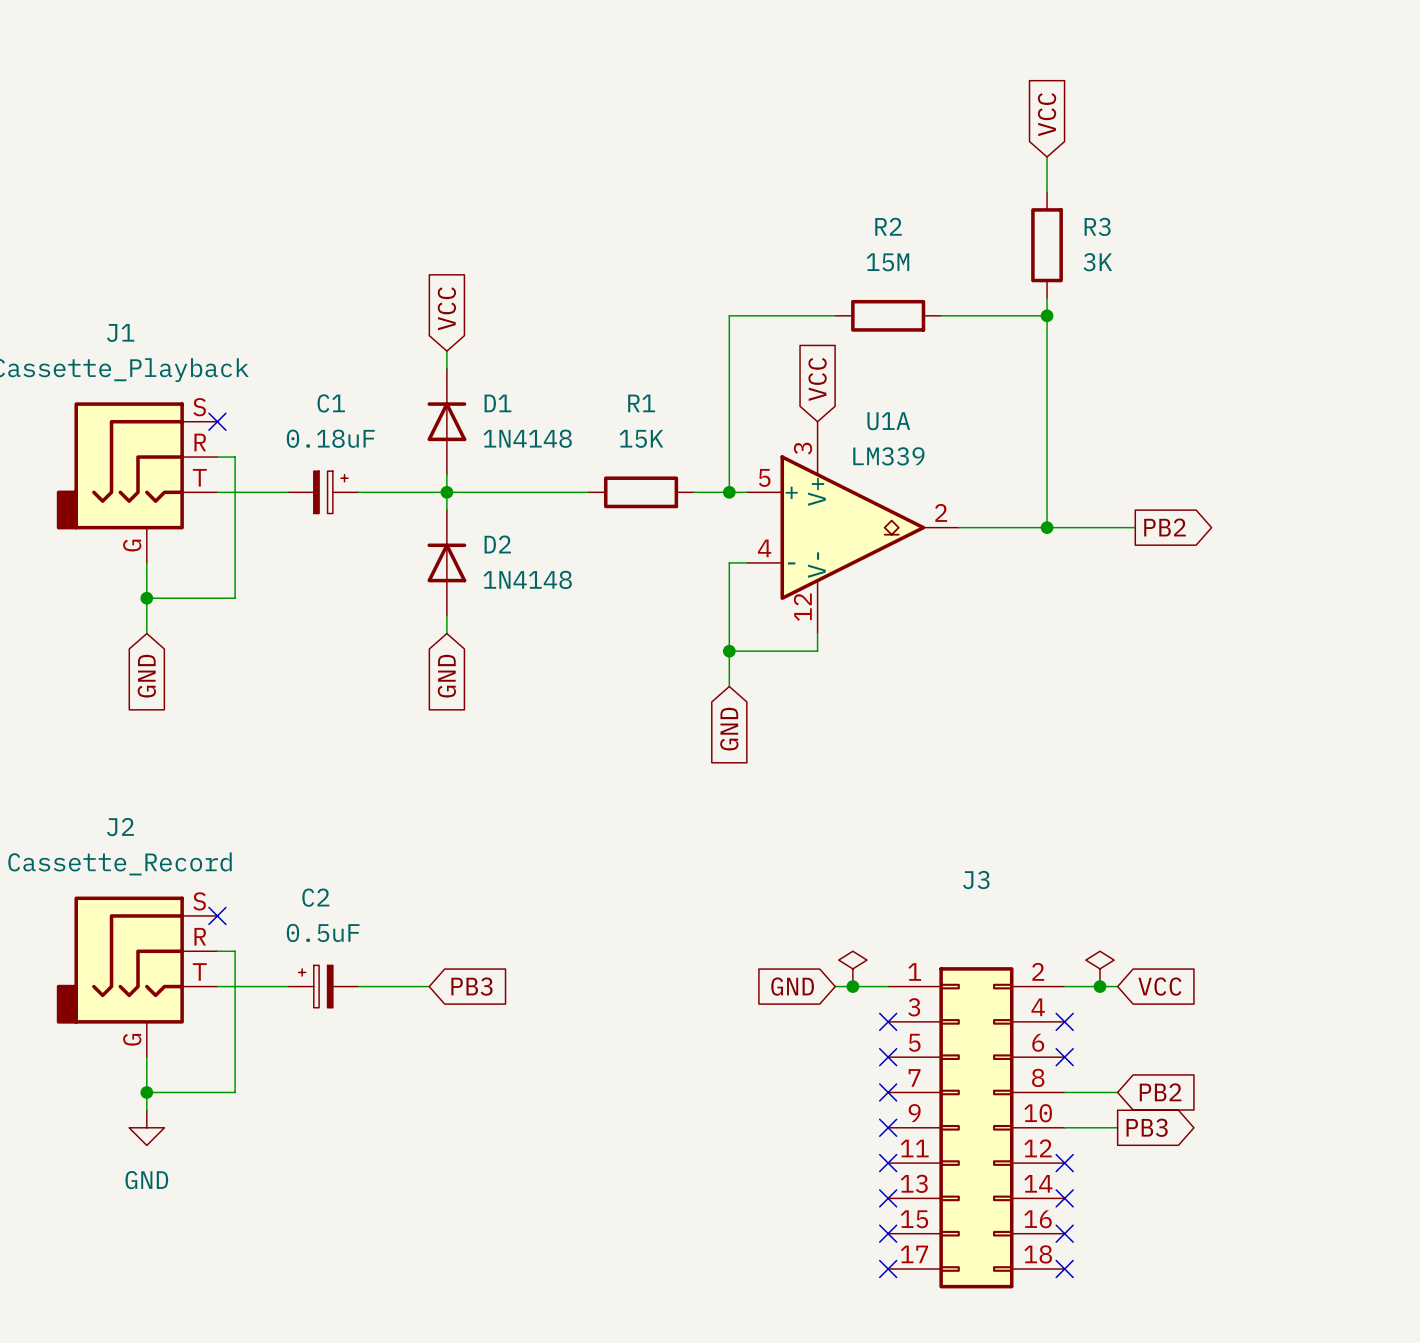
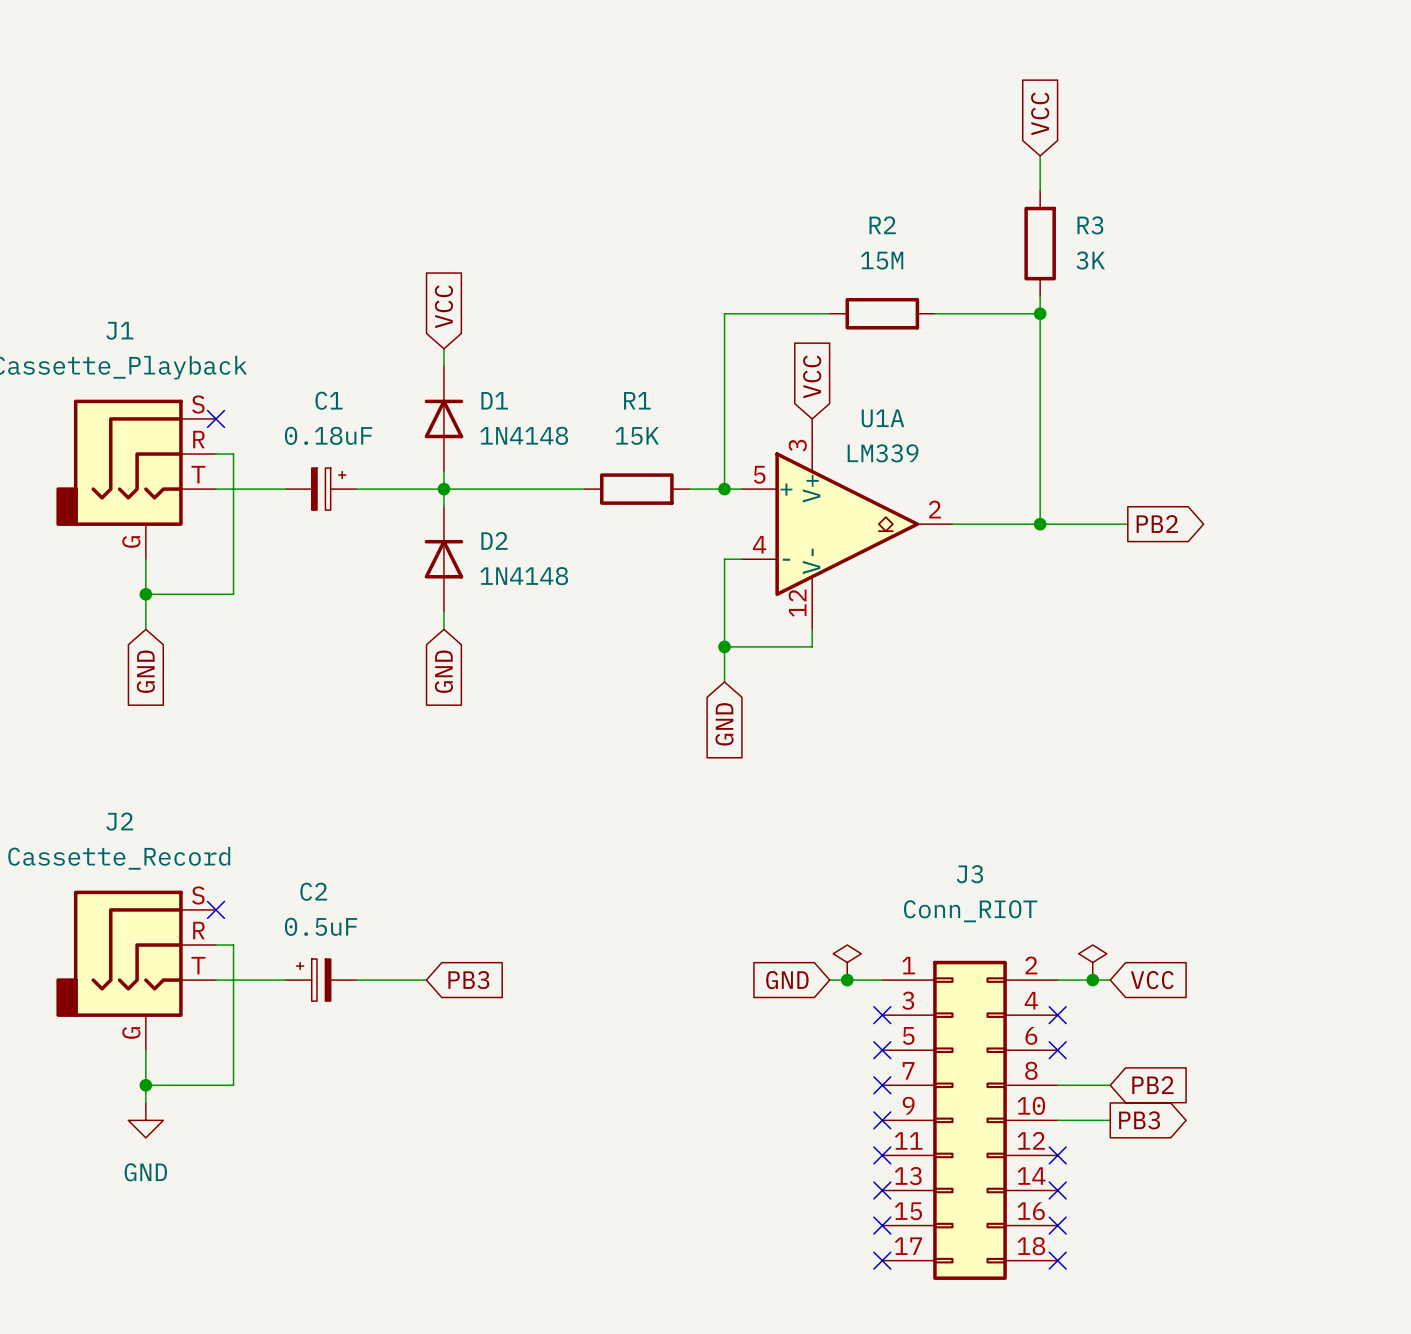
J3 value: none -> Conn_RIOT (970, 911)

